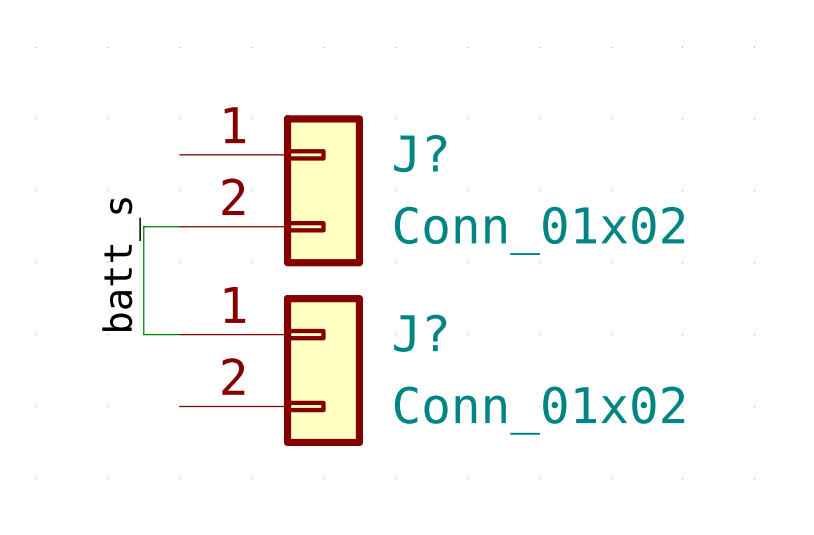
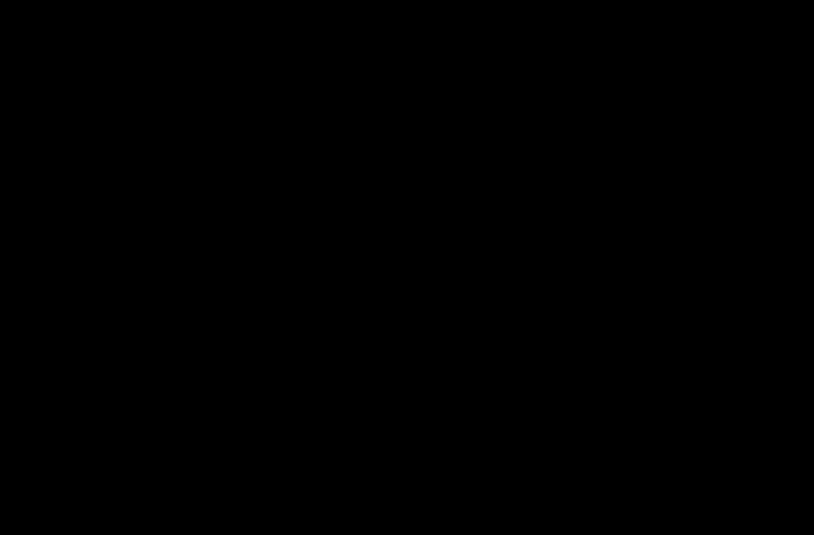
J?: Conn_01x02 (271, 190) -> none
wire: (179, 226) (143, 226) (143, 334) (179, 334) -> none
label: batt_s (121, 264) -> none
J?: Conn_01x02 (271, 370) -> none

